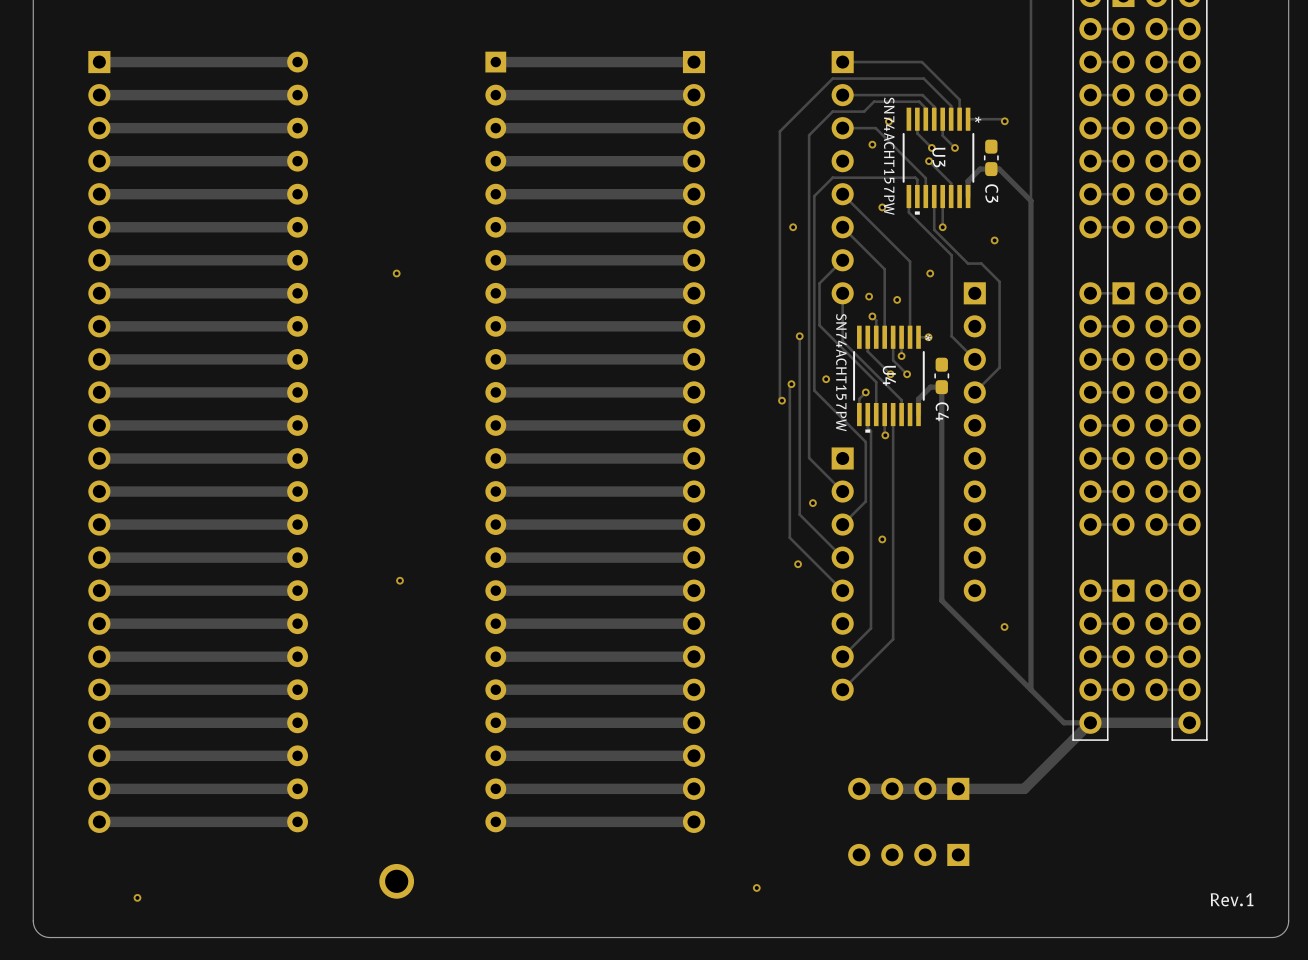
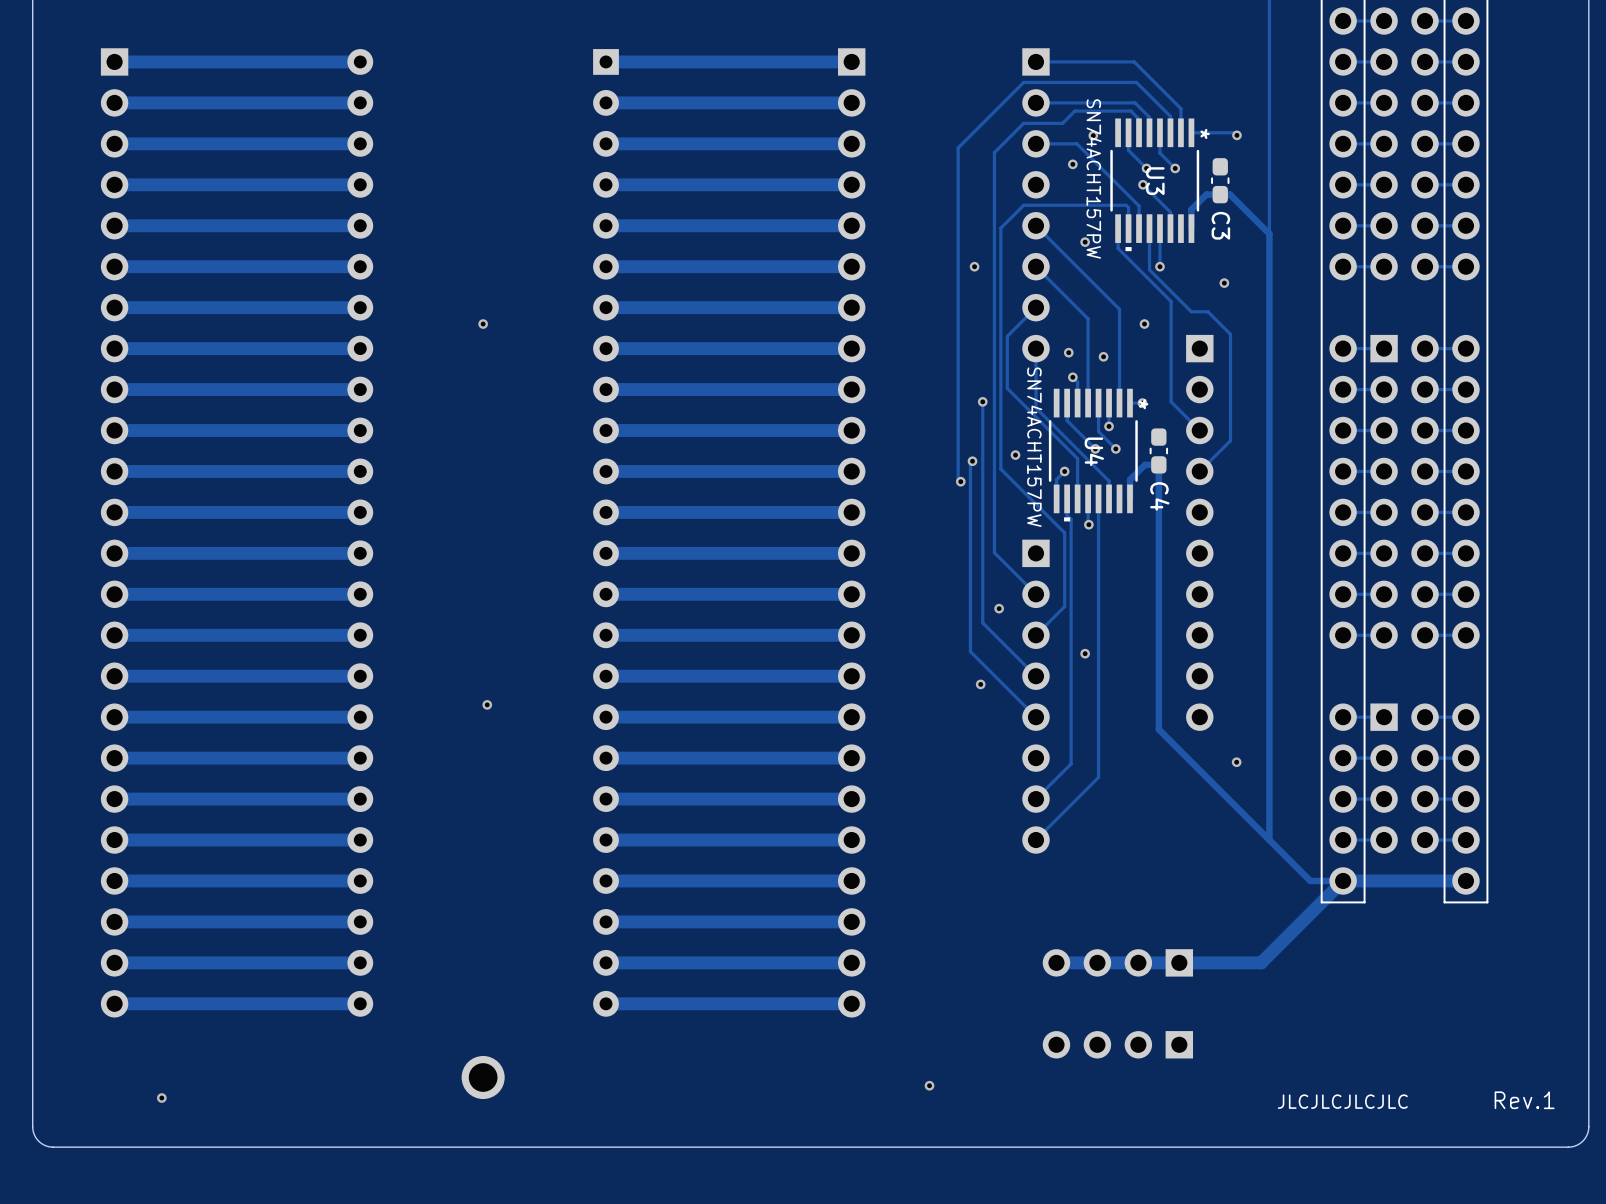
text: none -> JLCJLCJLCJLC (1342, 1101)

